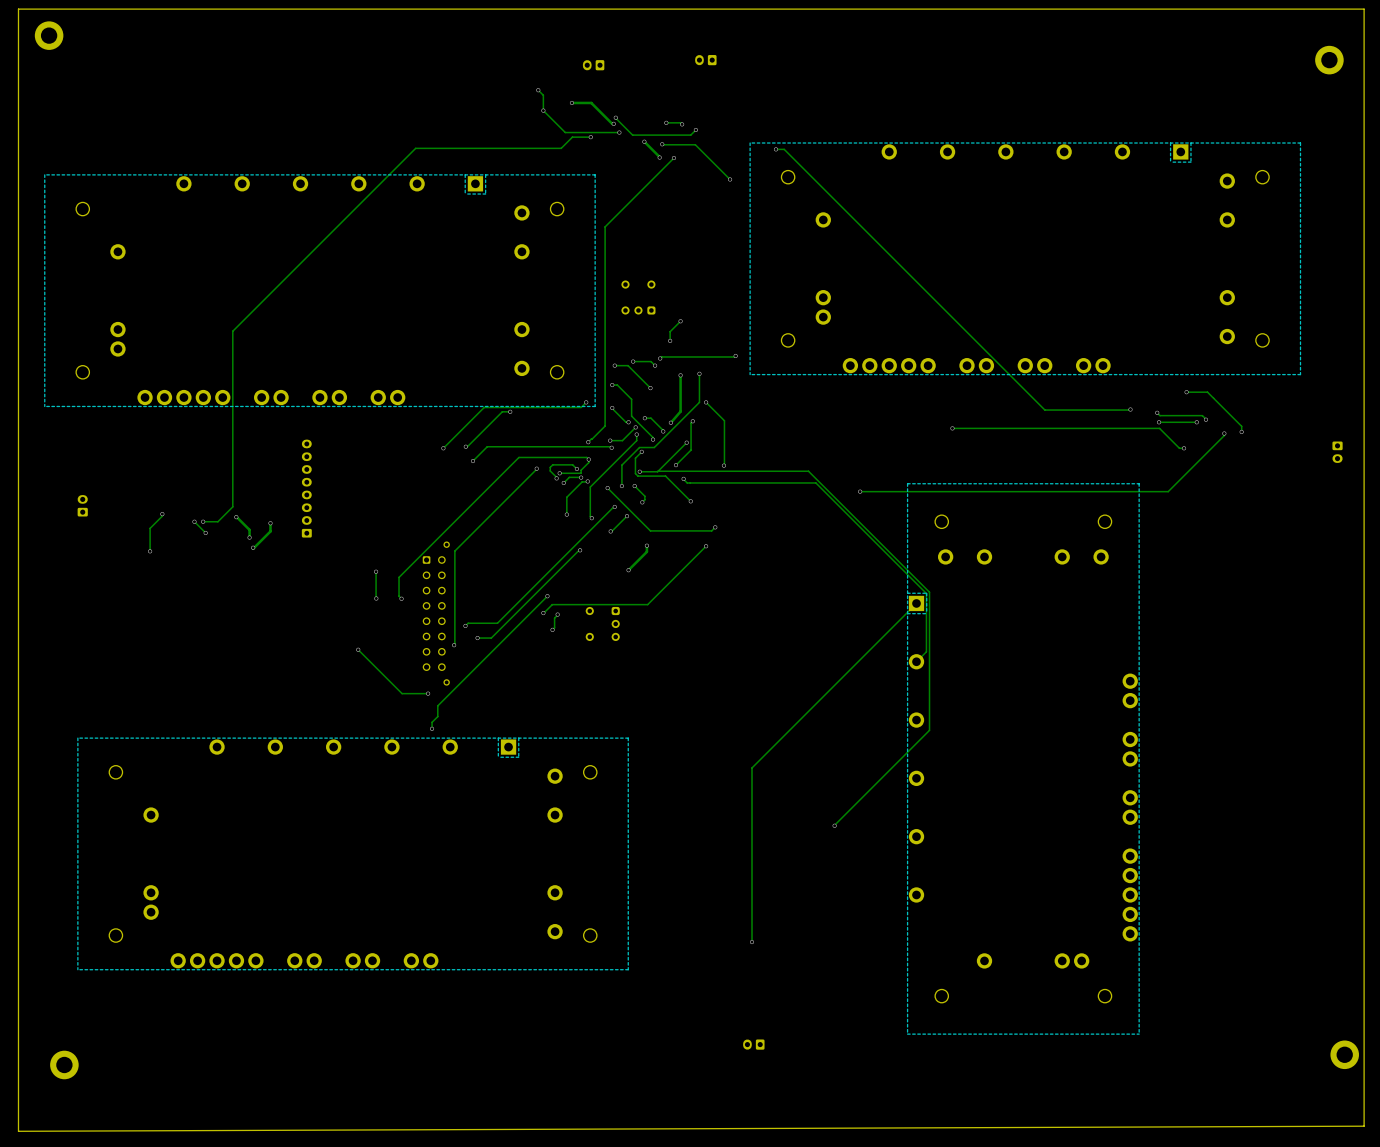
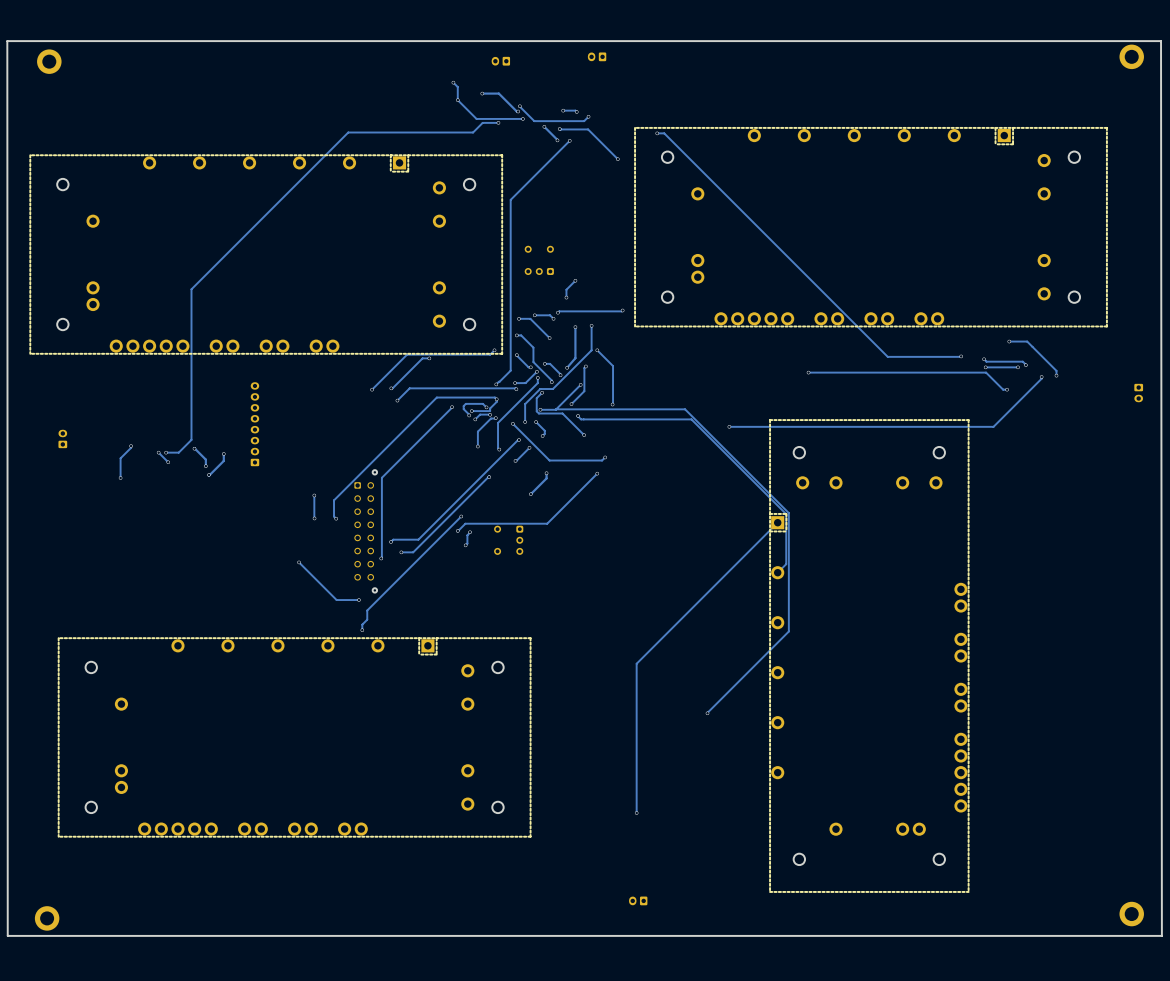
board edge: (1364, 9) (1364, 1126) (18, 1131) (18, 9) (1364, 9) -> (1161, 41) (1161, 935) (7, 935) (7, 41) (1161, 41)
part position: (49, 35) -> (49, 61)
part position: (1344, 1054) -> (1131, 914)

